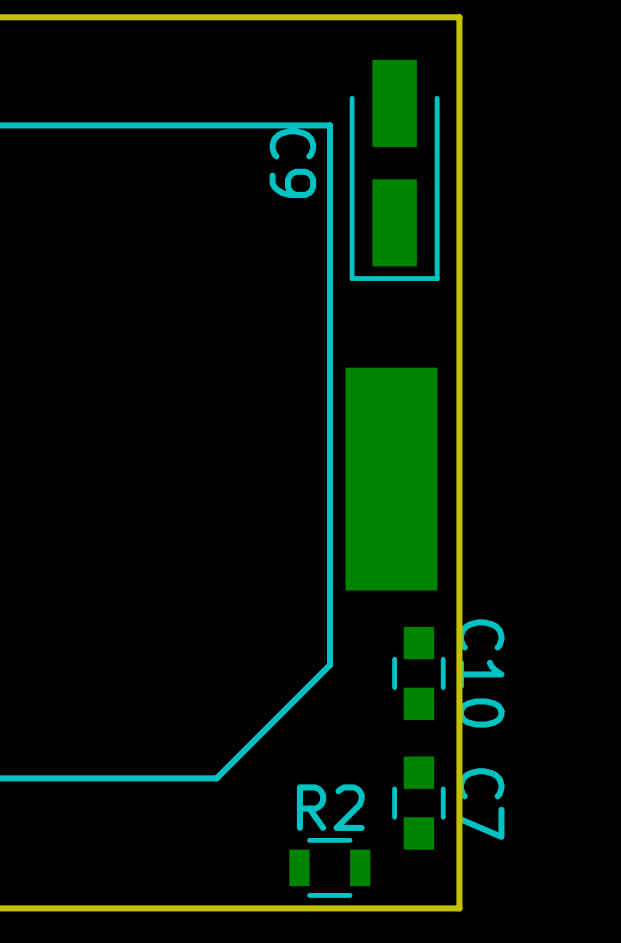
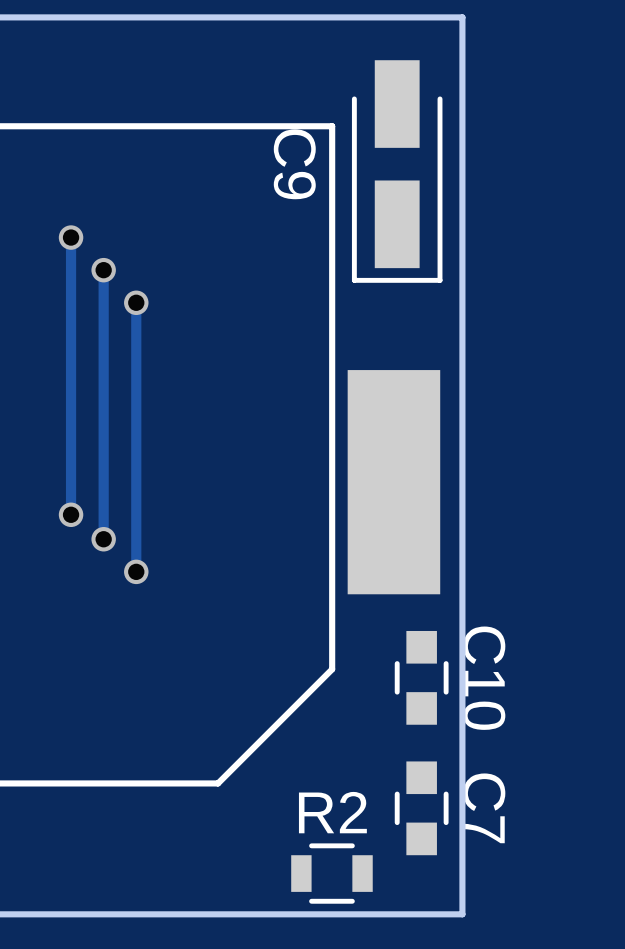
track: none -> (71, 237) (71, 514)
via: none -> (71, 237)
track: none -> (103, 270) (103, 539)
via: none -> (103, 270)
track: none -> (136, 302) (136, 571)
via: none -> (136, 302)
via: none -> (71, 514)
via: none -> (103, 539)
via: none -> (136, 571)

